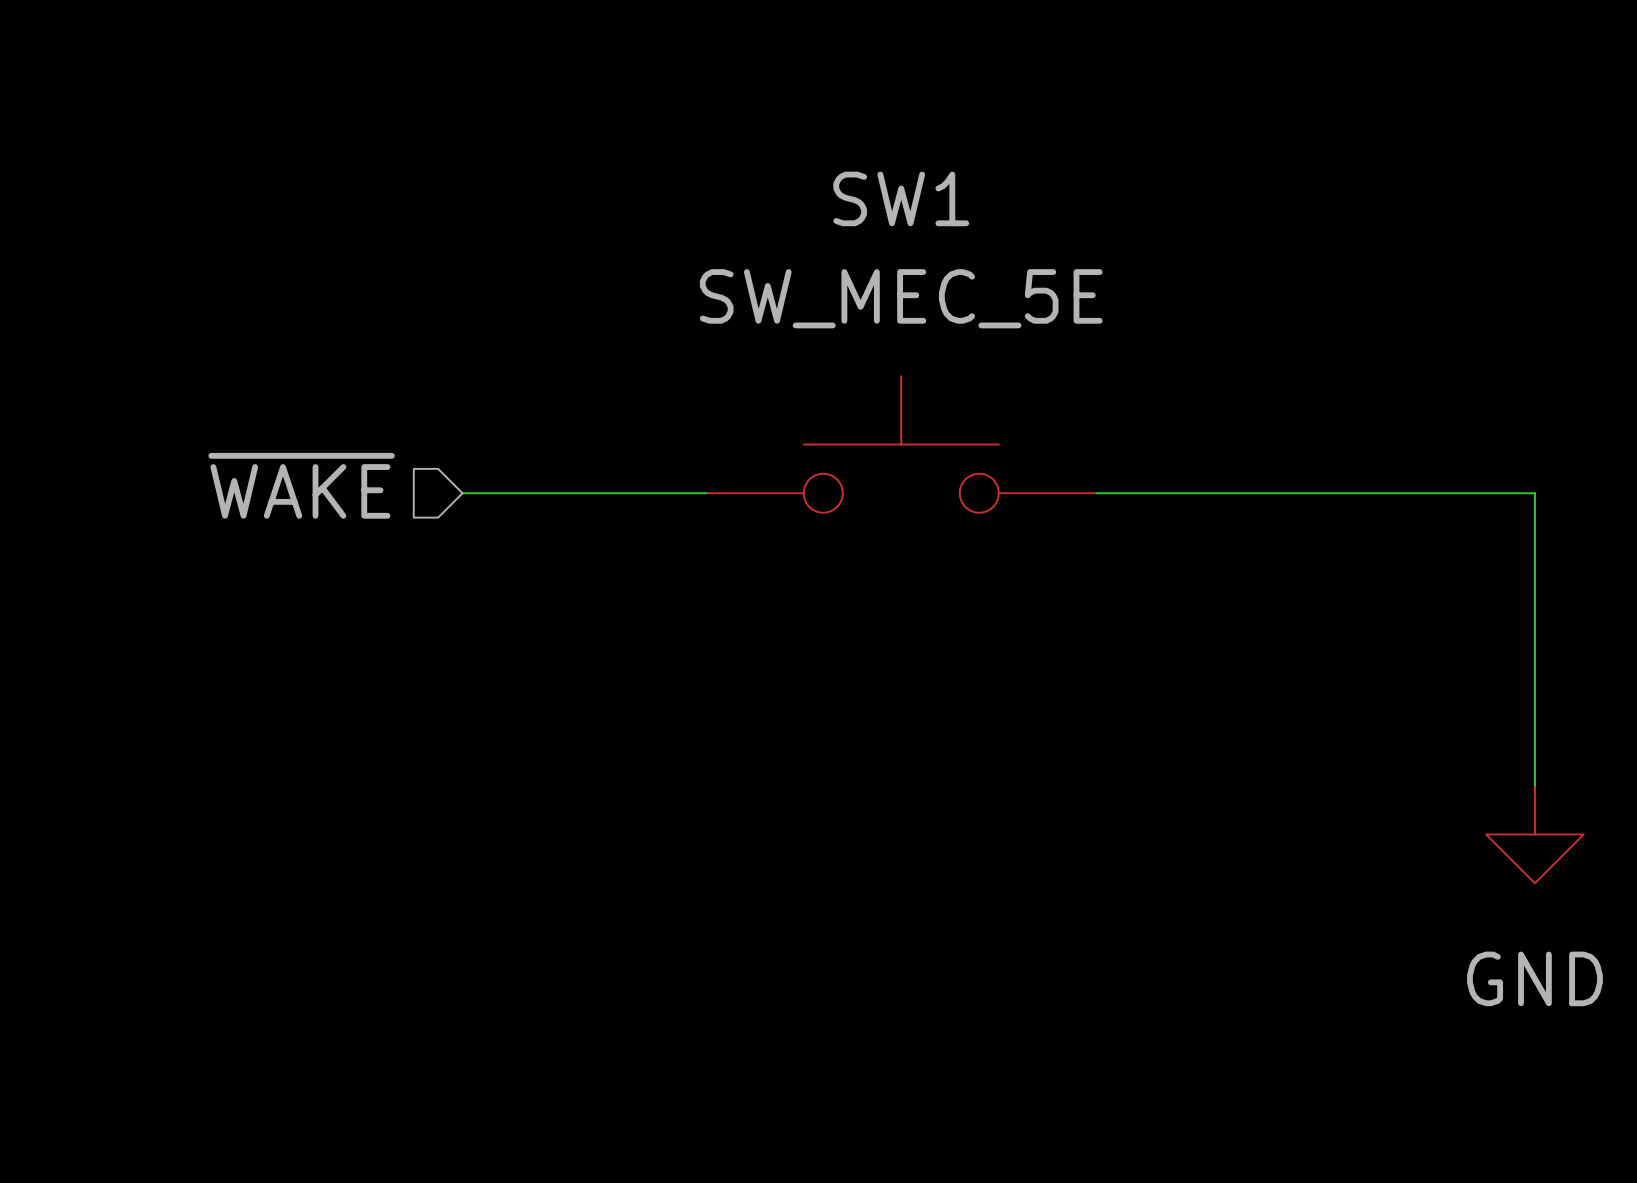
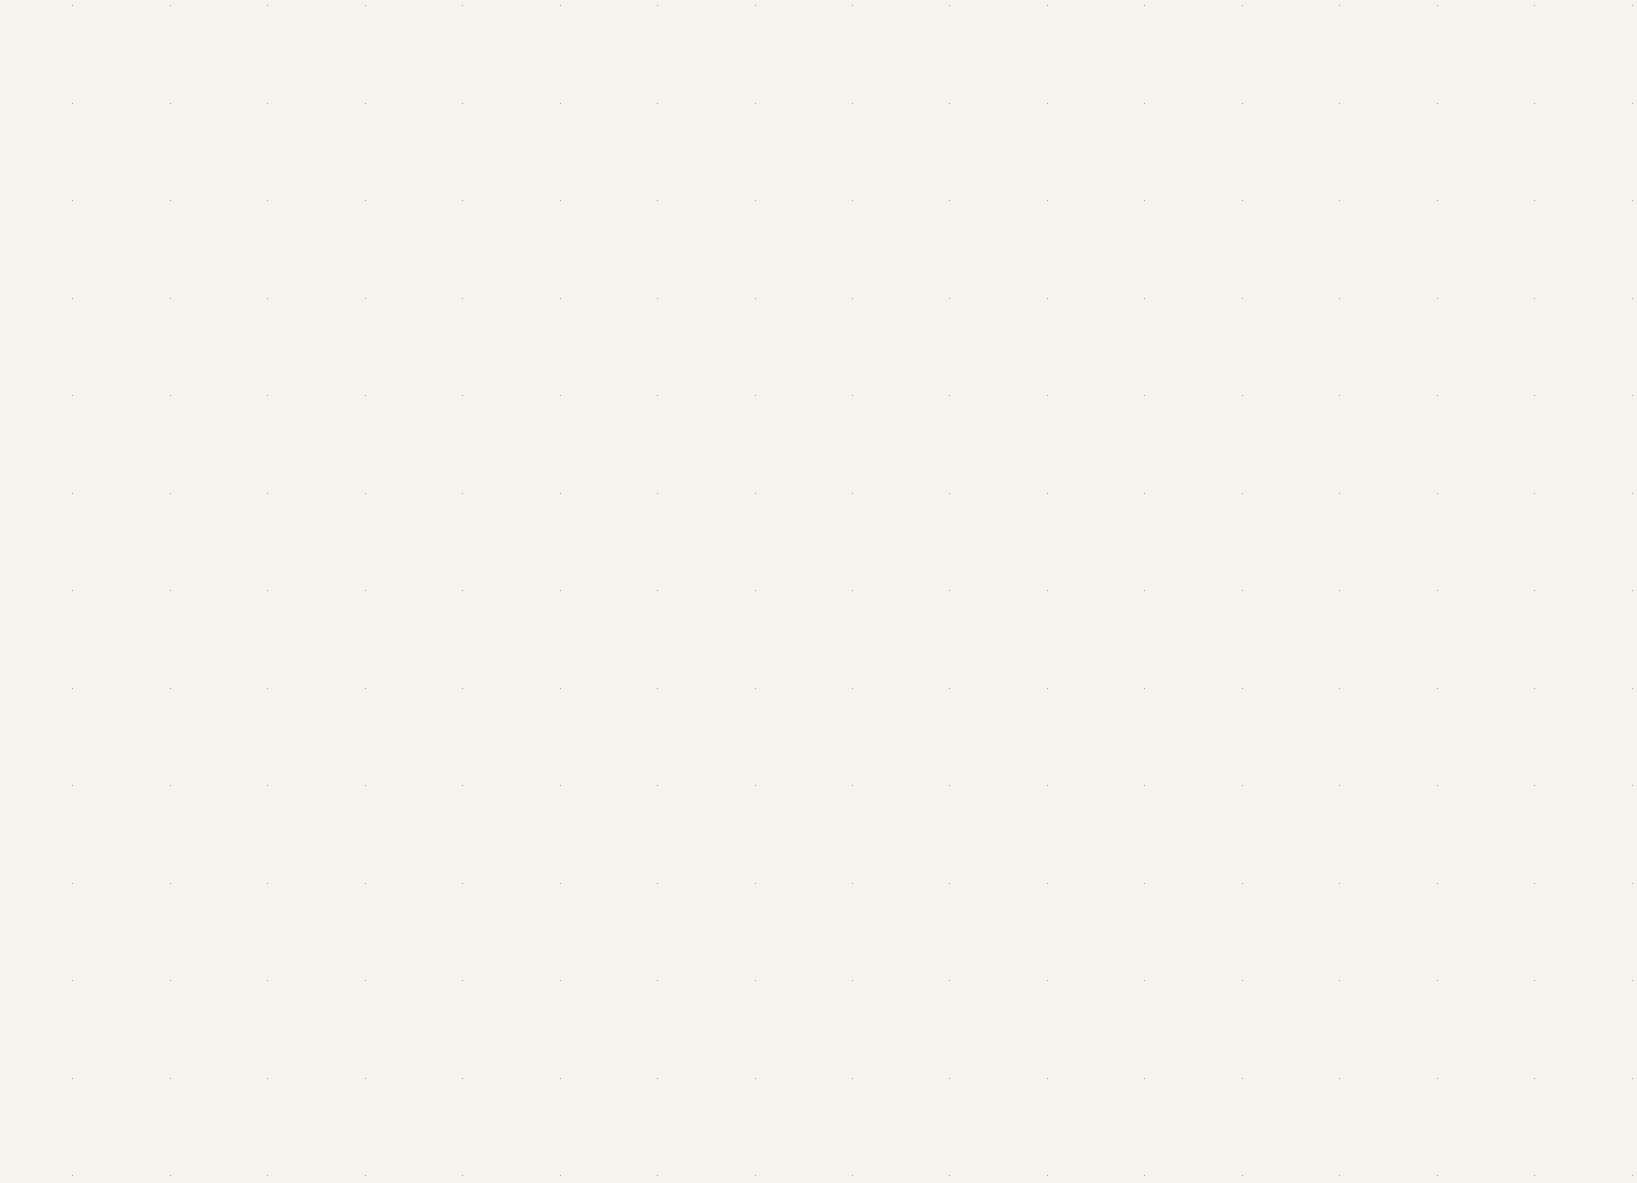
SW1: SW_MEC_5E (901, 444) -> none
hierarchical label: ~{WAKE} (301, 485) -> none
wire: (462, 493) (706, 493) -> none
wire: (1096, 493) (1534, 493) (1534, 785) -> none
power symbol: GND (1534, 834) -> none

